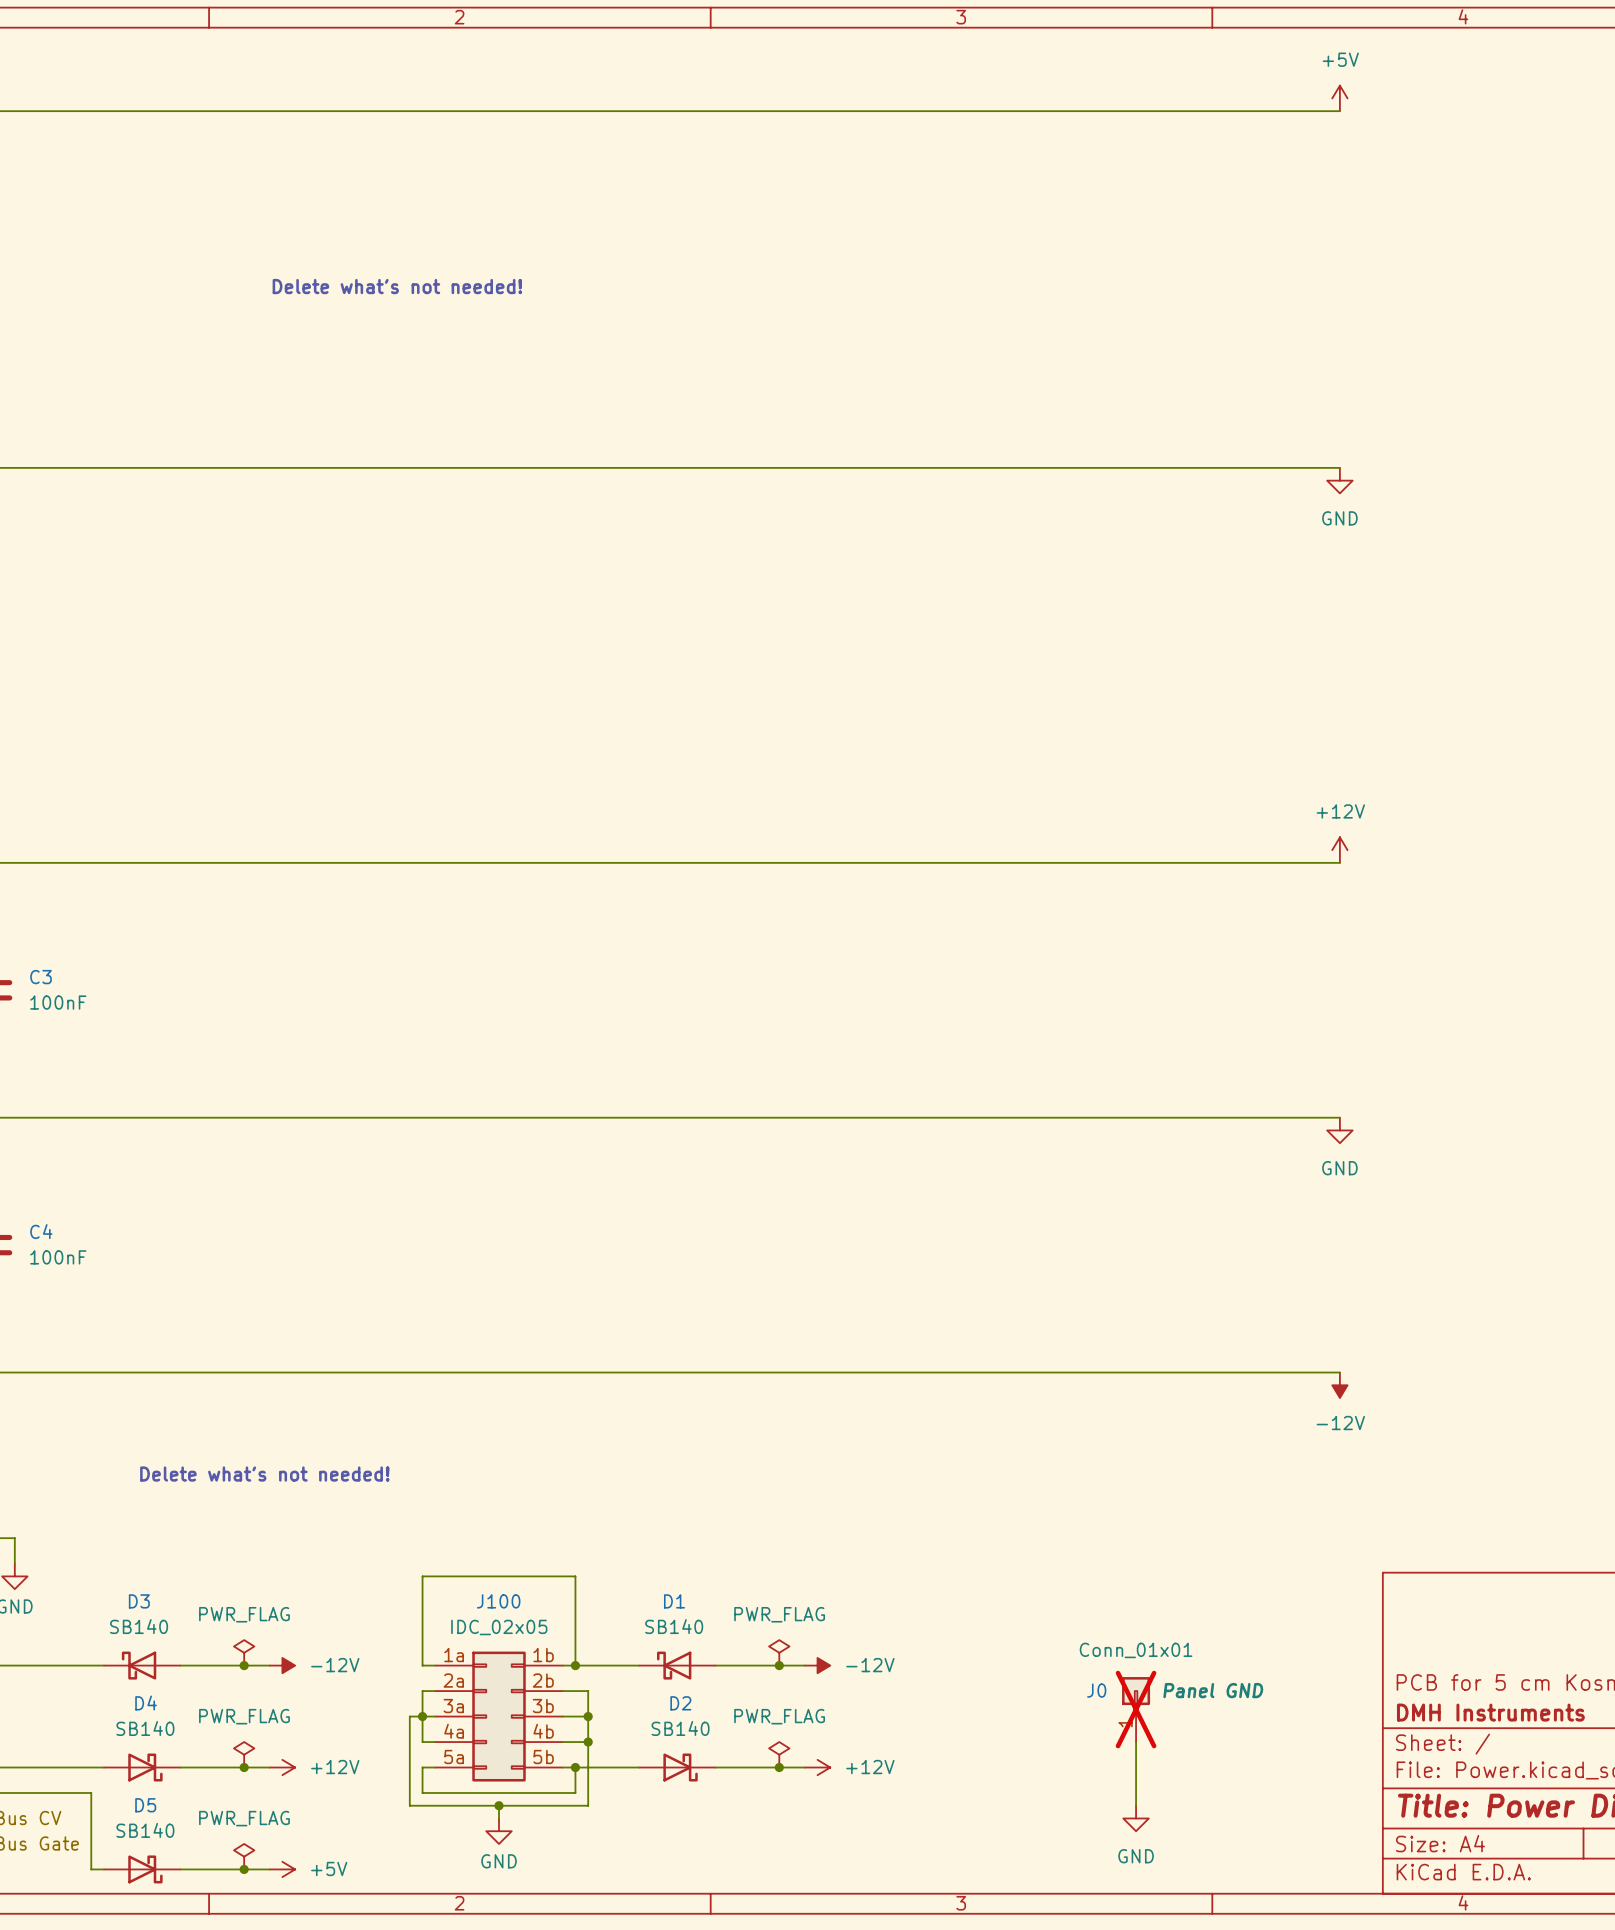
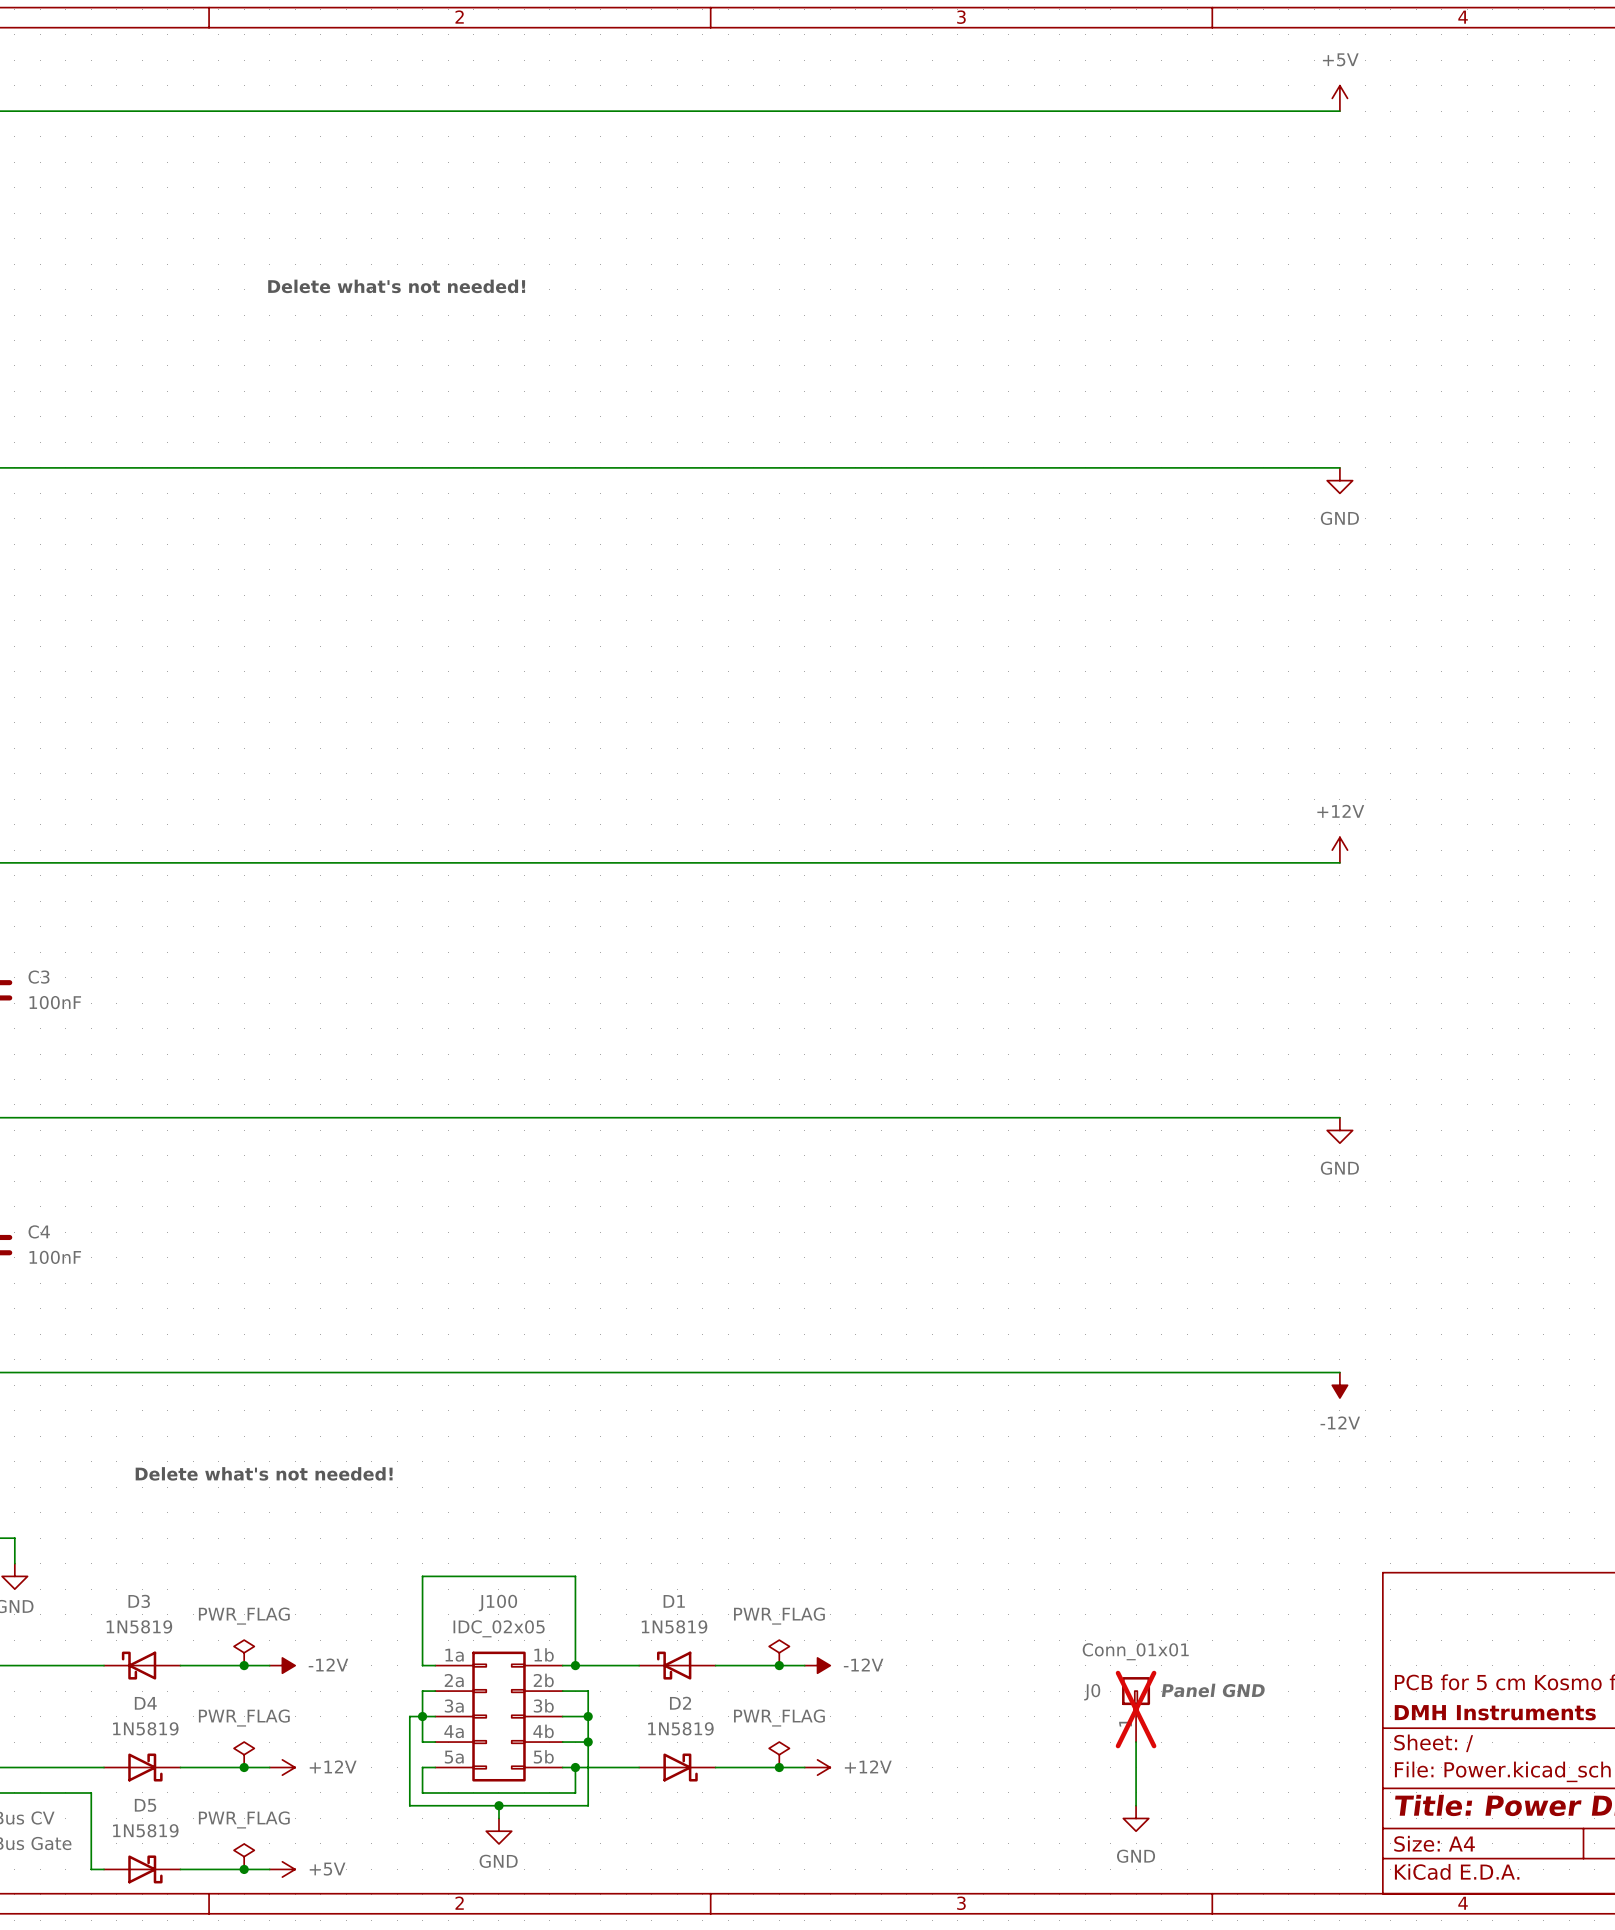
D3 value: SB140 (139, 1626) -> 1N5819 (139, 1626)
D1 value: SB140 (674, 1626) -> 1N5819 (674, 1626)
D4 value: SB140 (145, 1728) -> 1N5819 (145, 1728)
D2 value: SB140 (680, 1728) -> 1N5819 (680, 1728)
D5 value: SB140 (145, 1830) -> 1N5819 (145, 1830)

